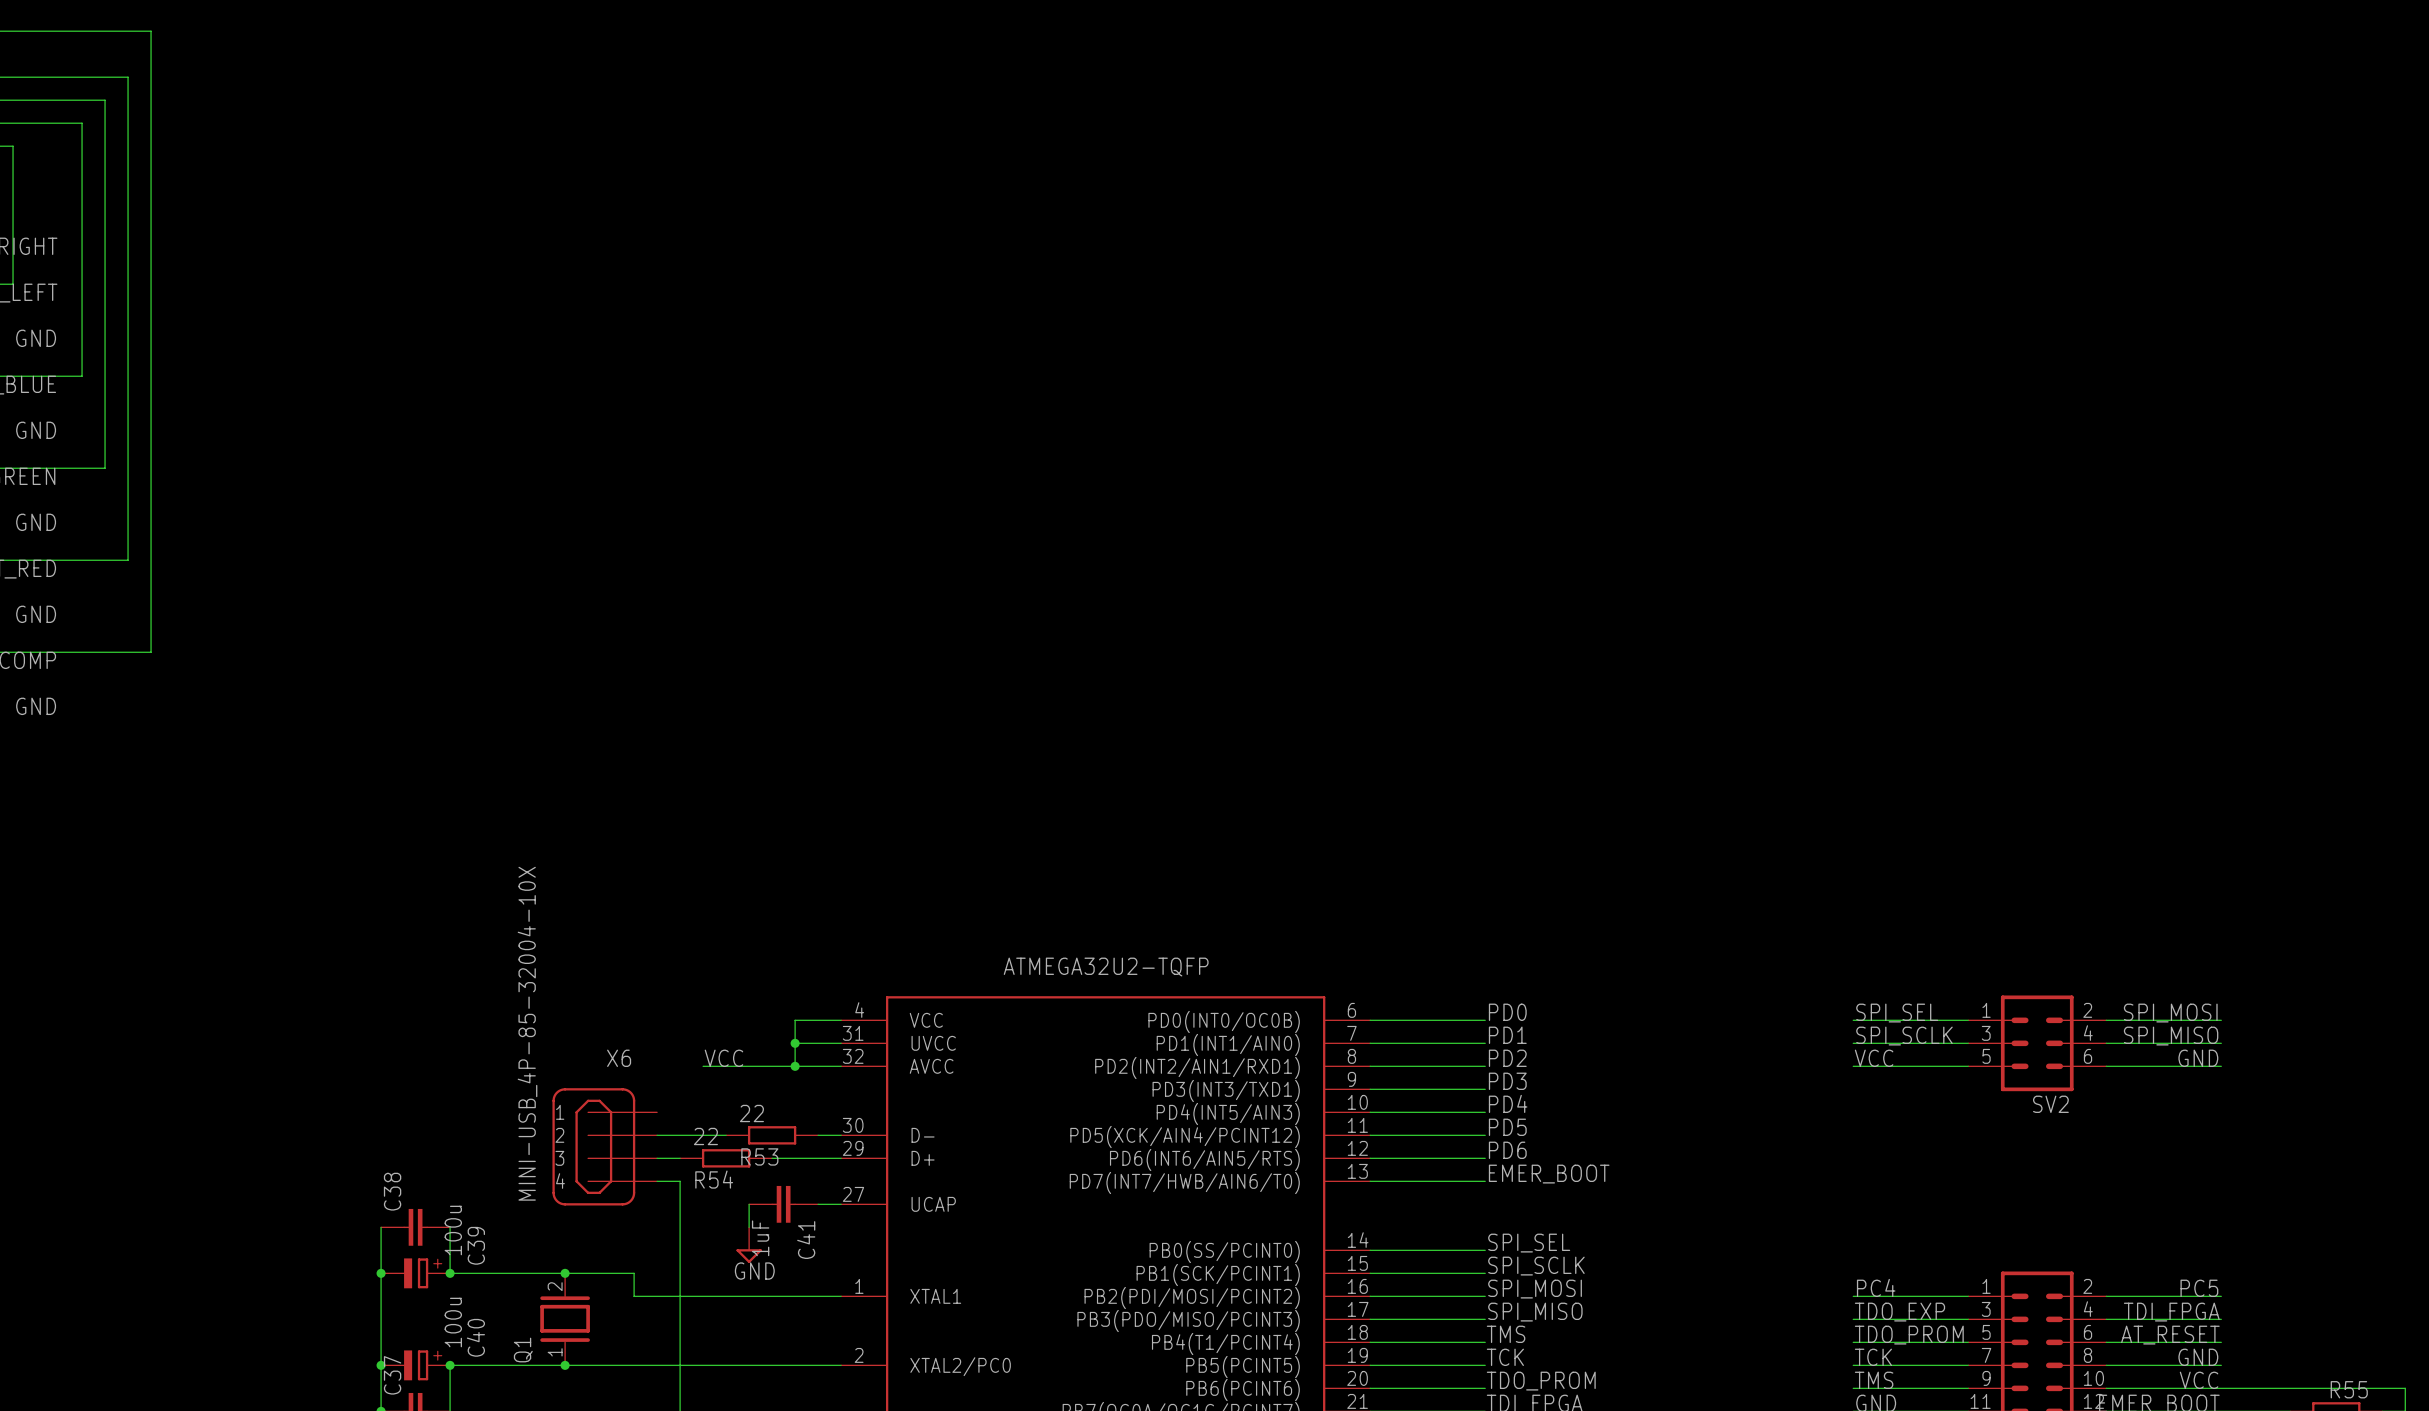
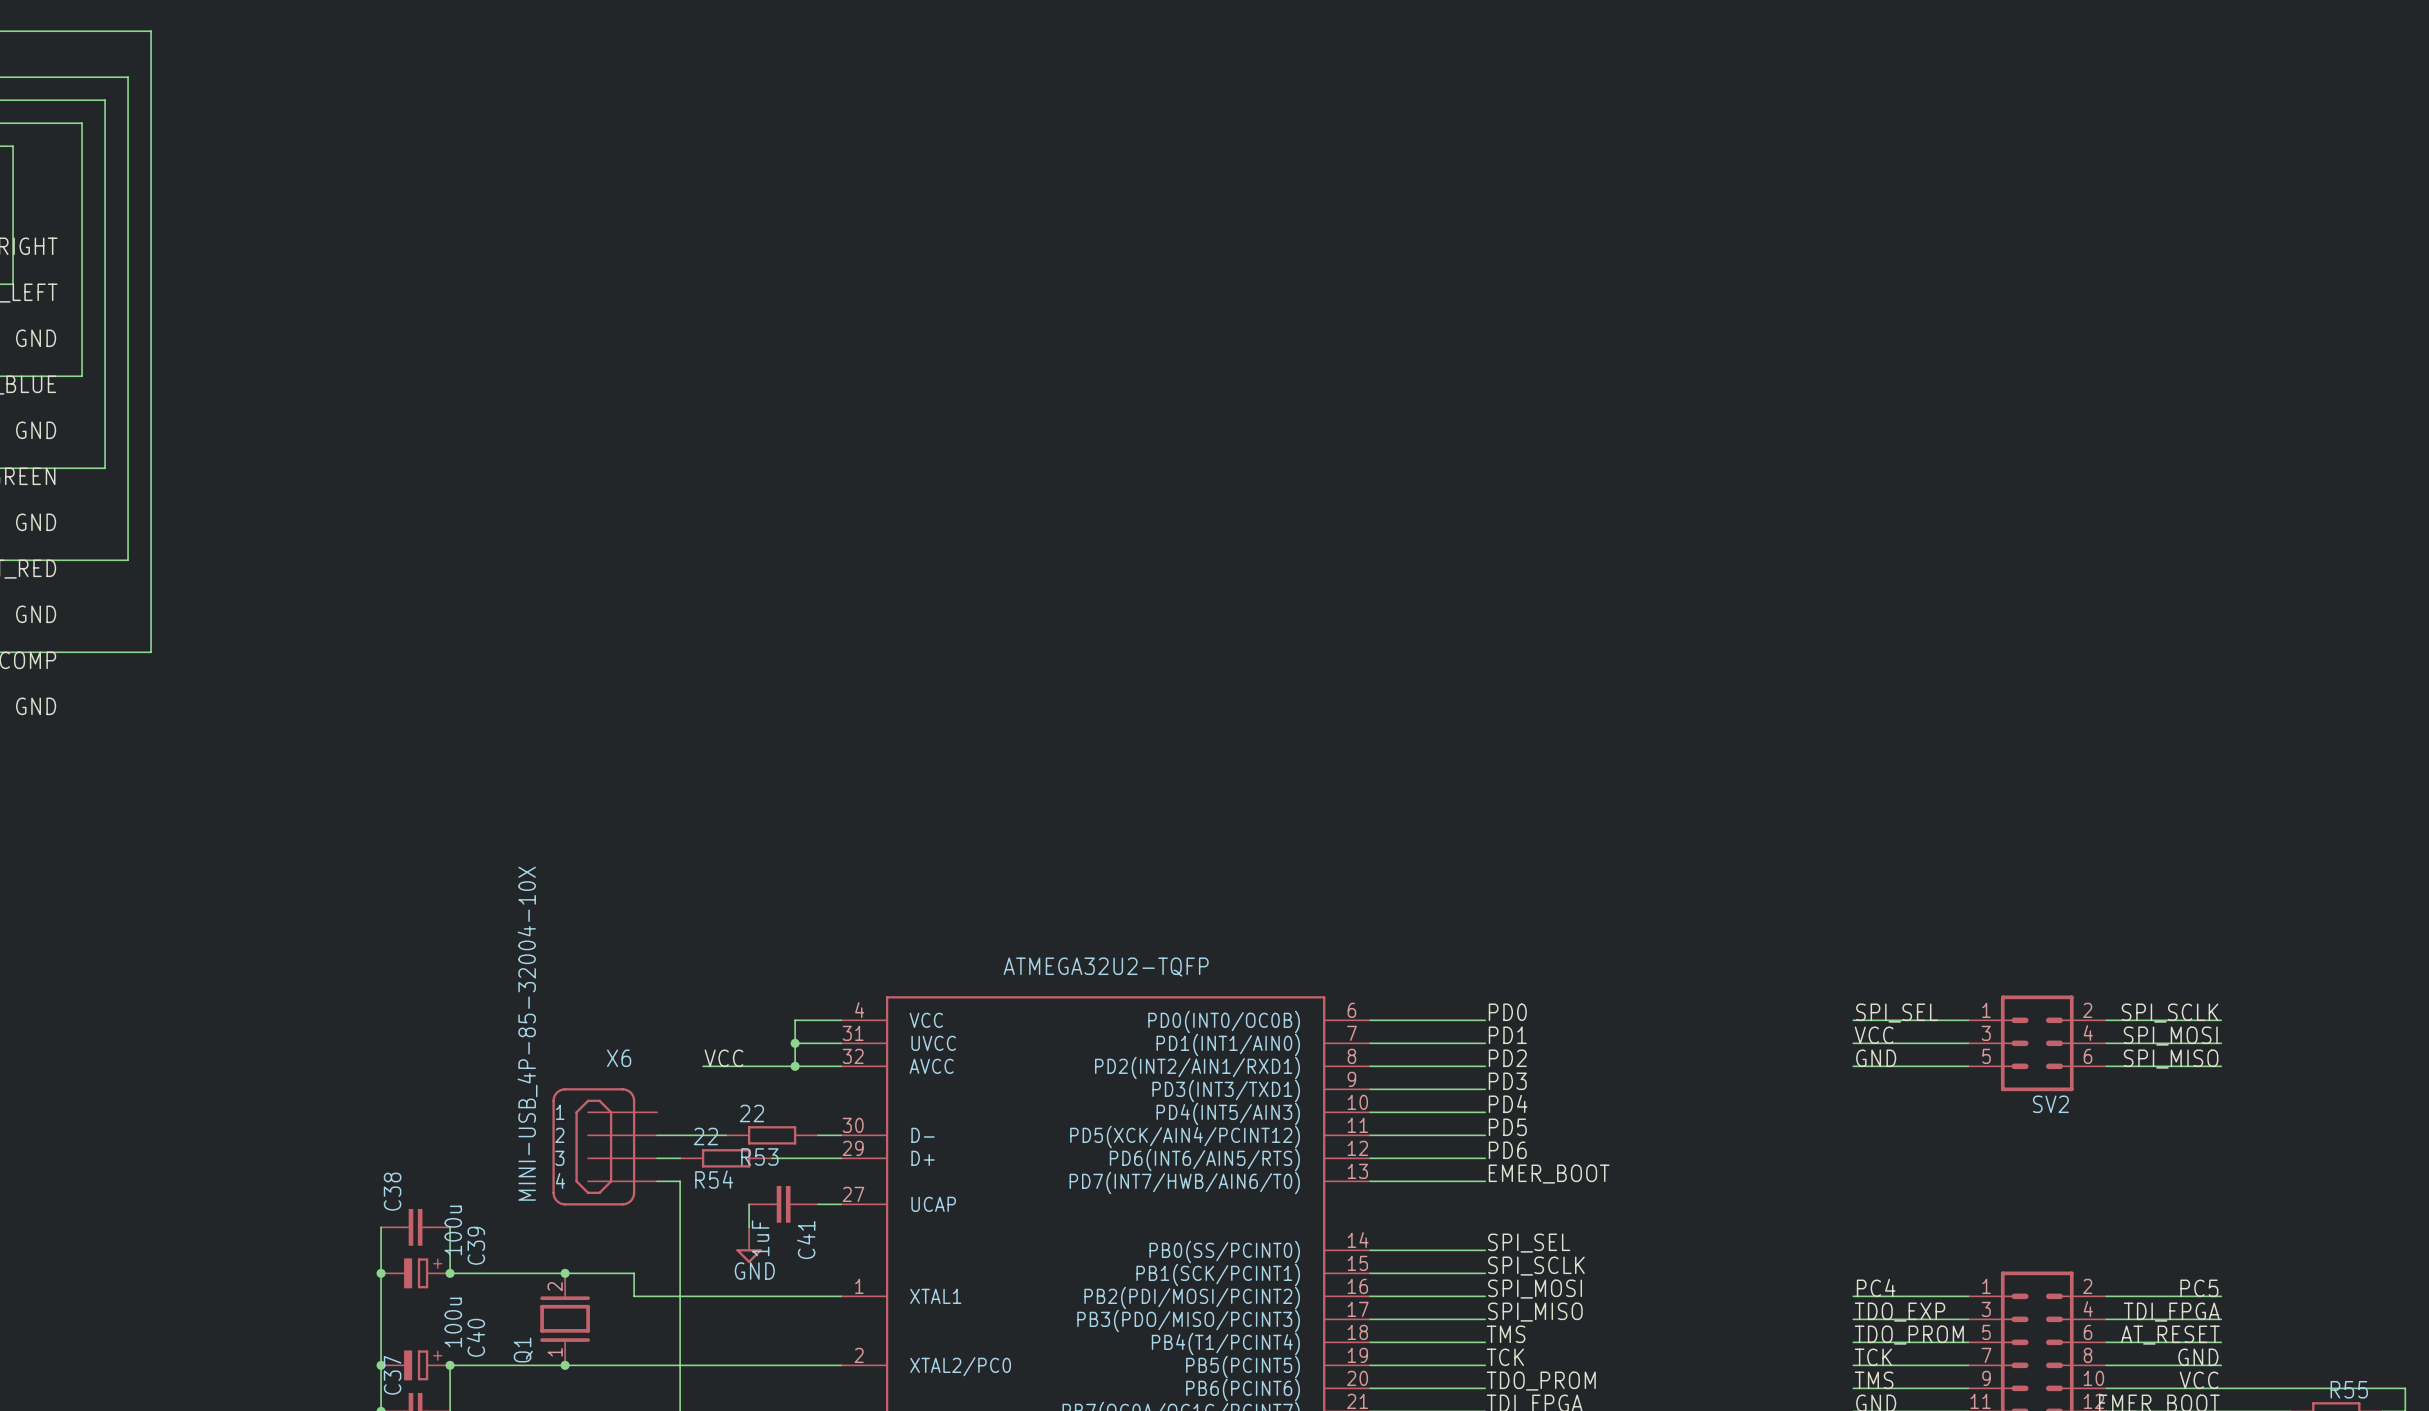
label: SPI_MOSI (2170, 1013) -> SPI_SCLK (2170, 1013)
label: SPI_SCLK (1904, 1036) -> VCC (1874, 1035)
label: SPI_MISO (2171, 1036) -> SPI_MOSI (2170, 1036)
label: VCC (1874, 1058) -> GND (1876, 1058)
label: GND (2198, 1058) -> SPI_MISO (2171, 1059)

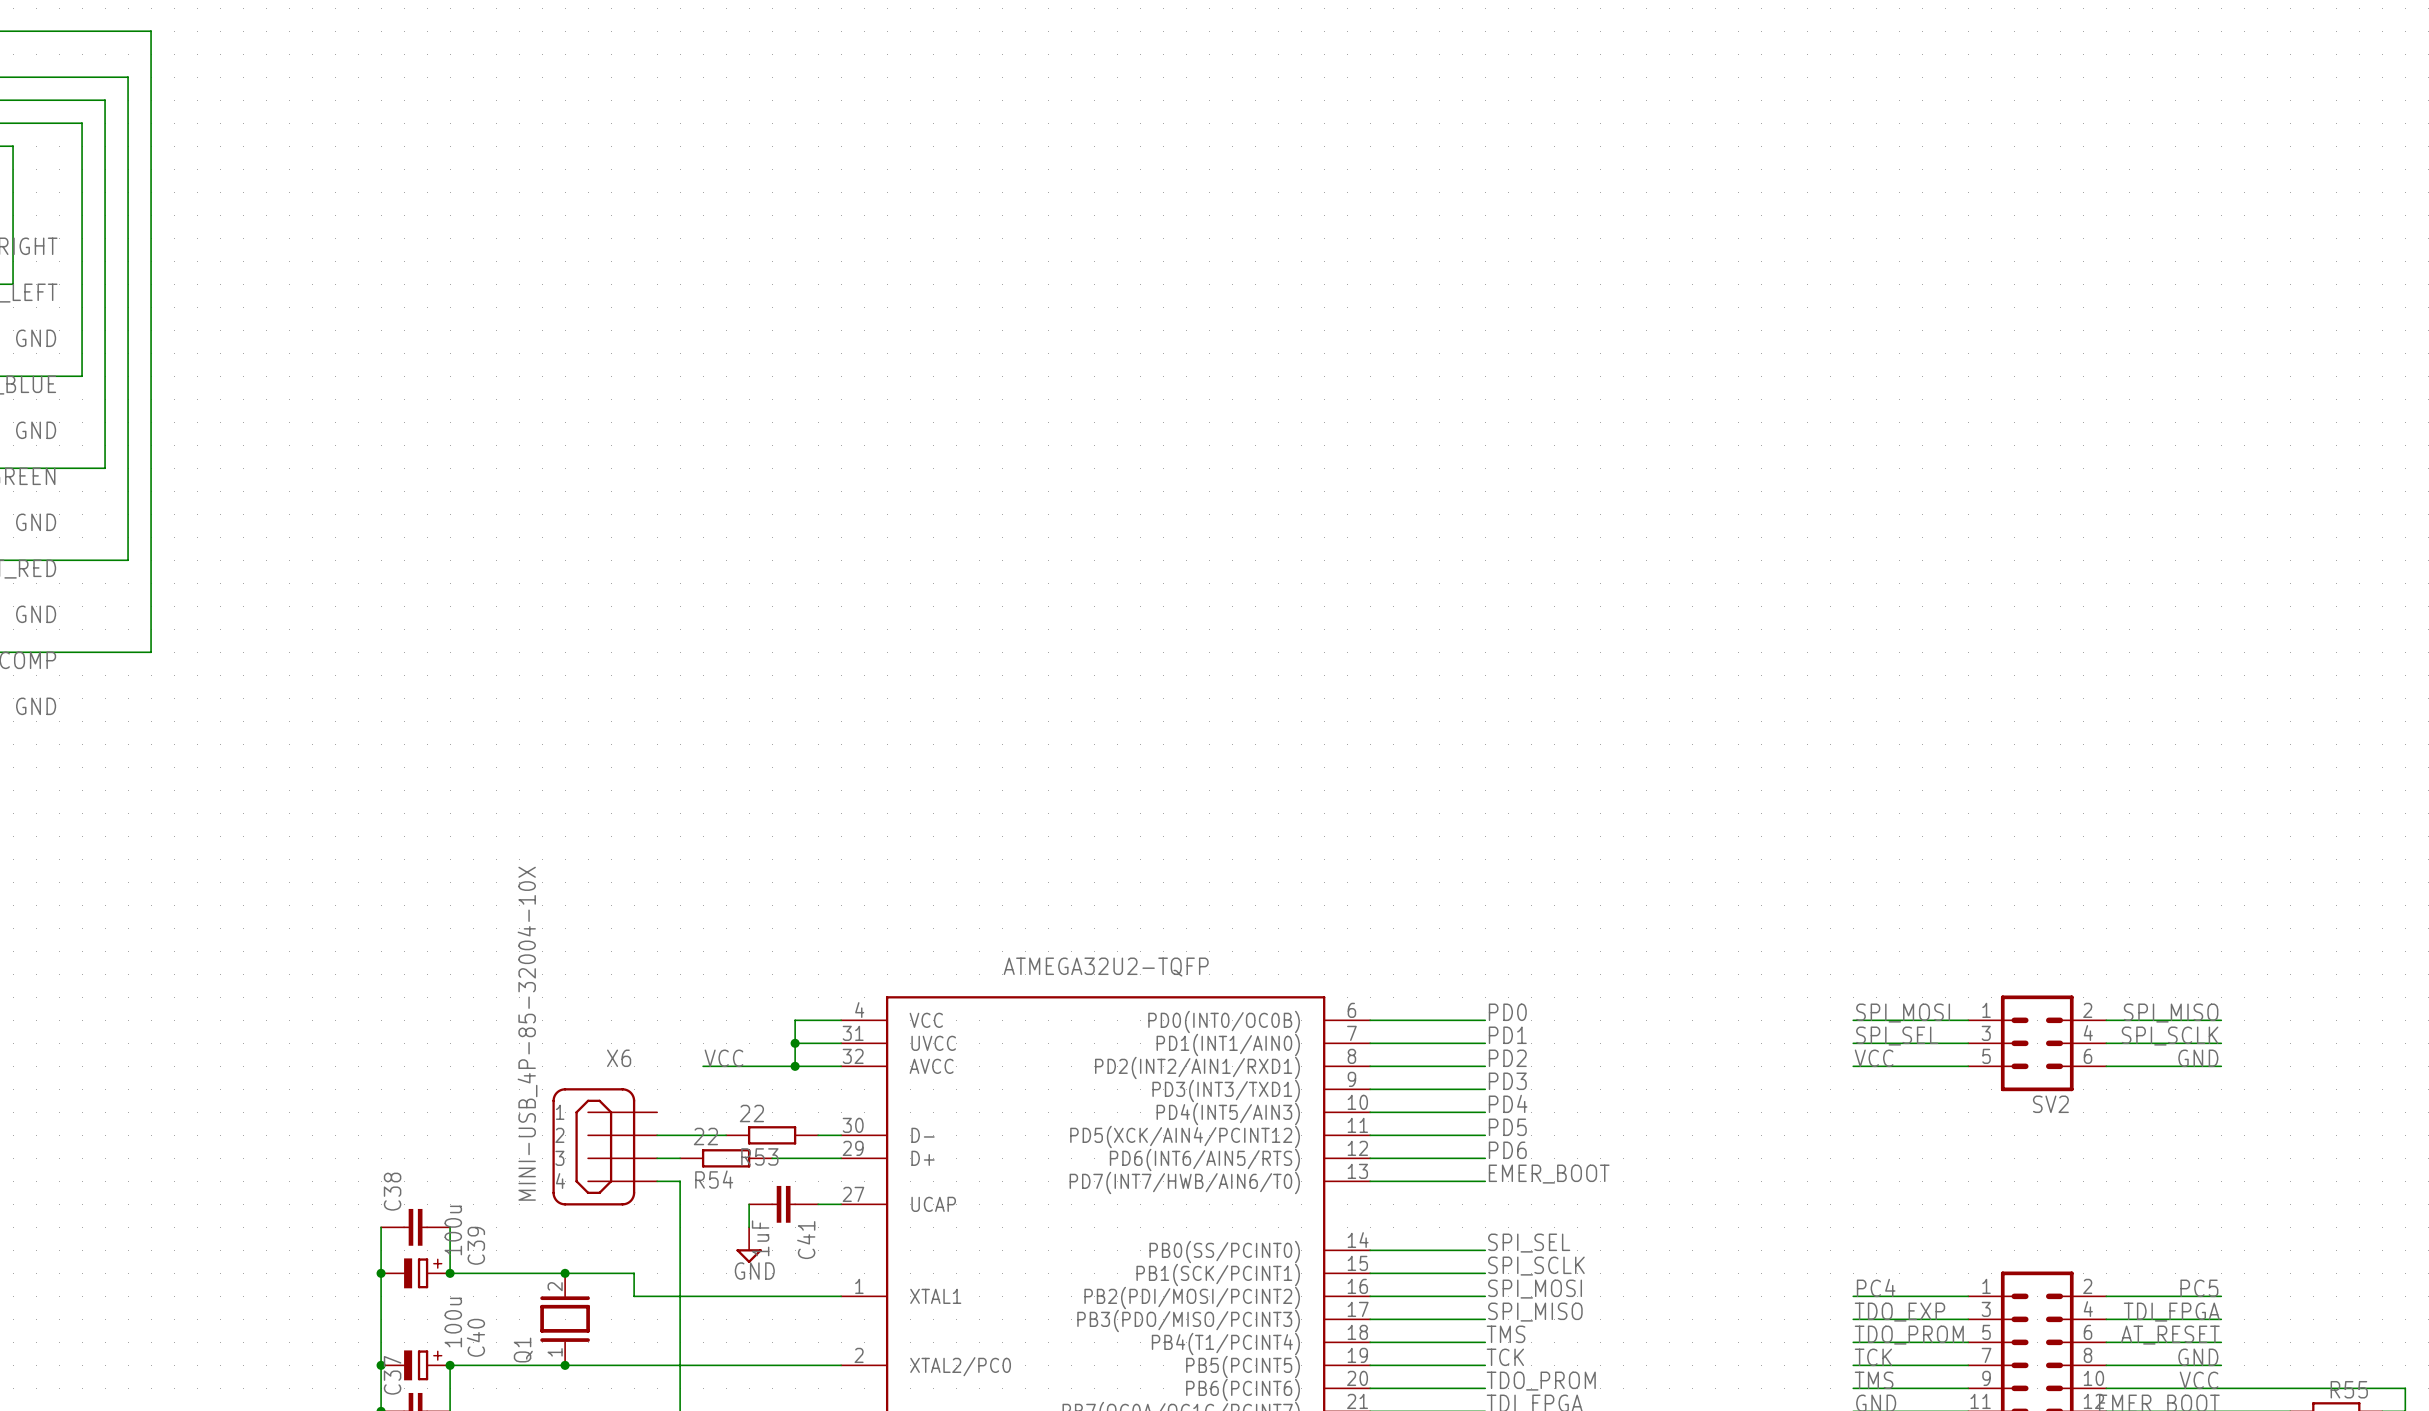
label: SPI_SEL (1897, 1013) -> SPI_MOSI (1903, 1013)
label: SPI_SCLK (2170, 1013) -> SPI_MISO (2171, 1013)
label: VCC (1874, 1035) -> SPI_SEL (1897, 1036)
label: SPI_MOSI (2170, 1036) -> SPI_SCLK (2170, 1036)
label: GND (1876, 1058) -> VCC (1874, 1058)
label: SPI_MISO (2171, 1059) -> GND (2198, 1058)

